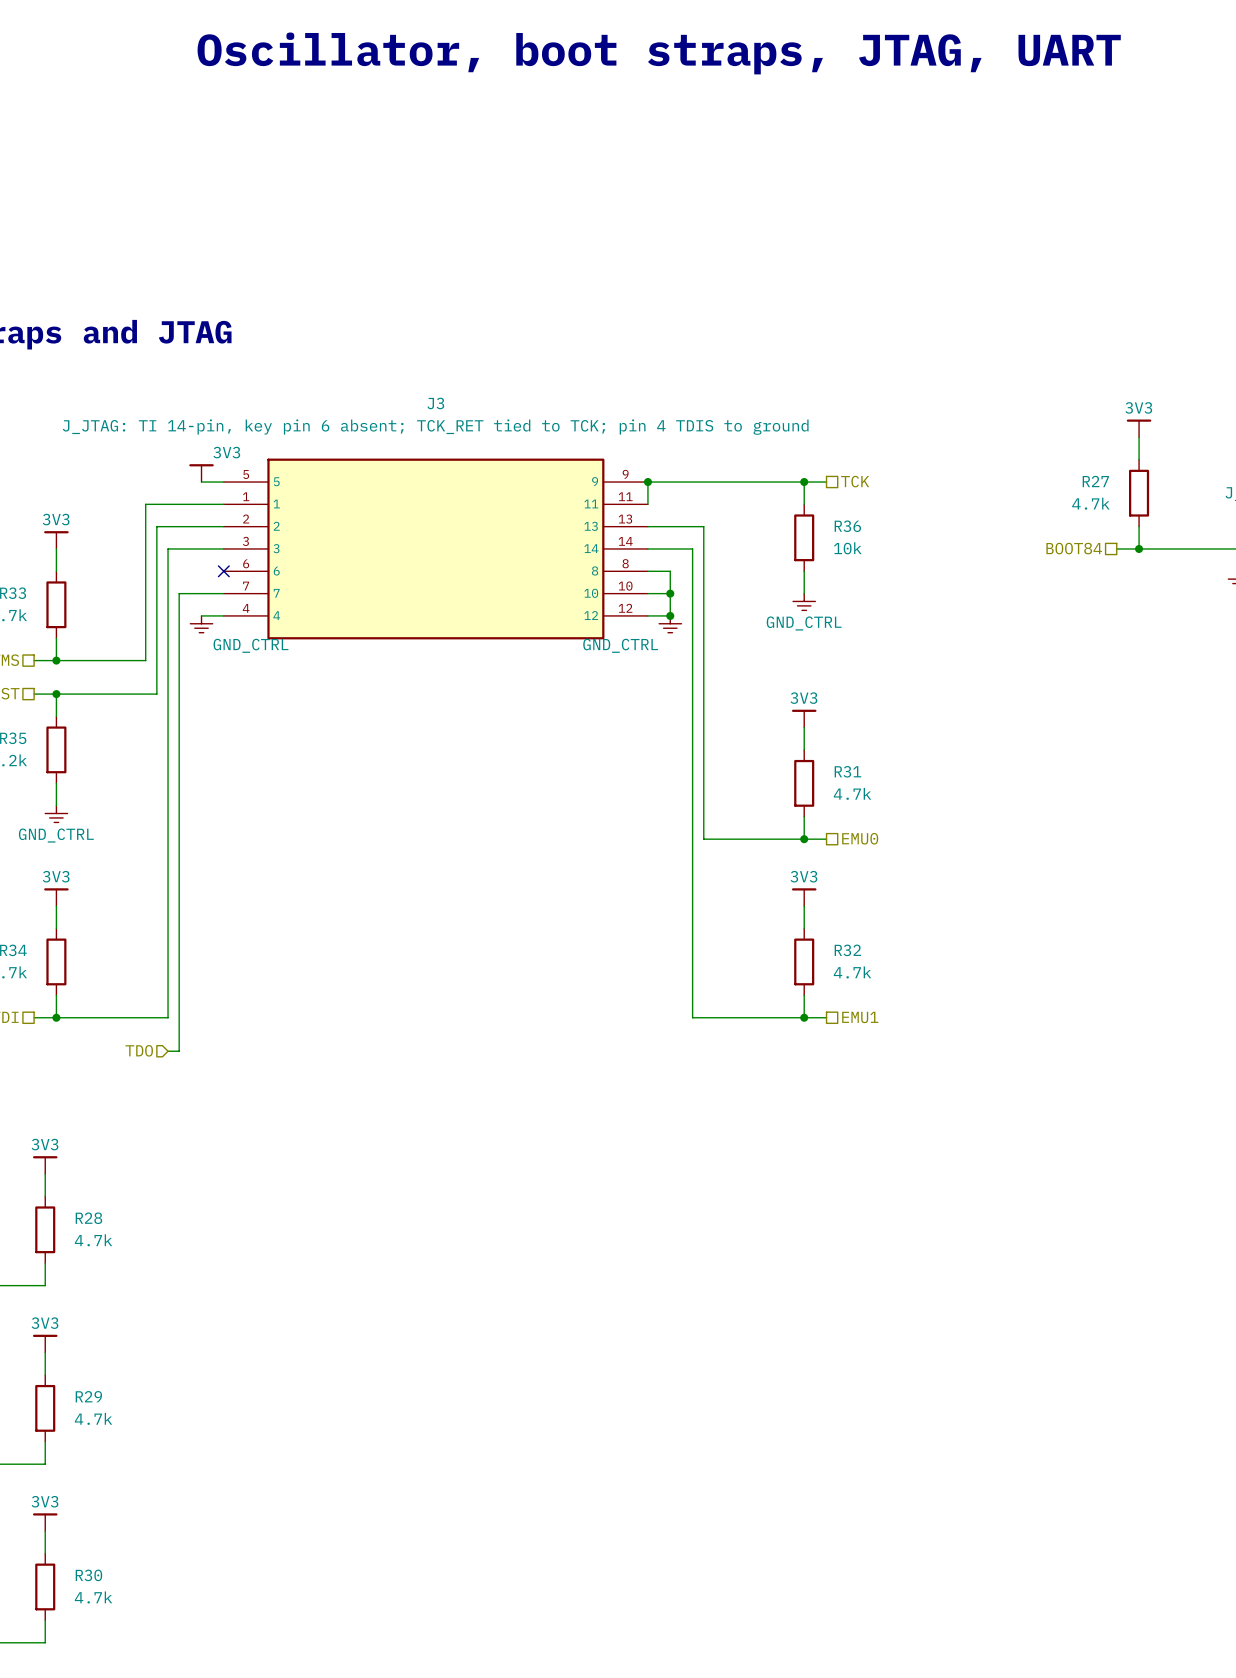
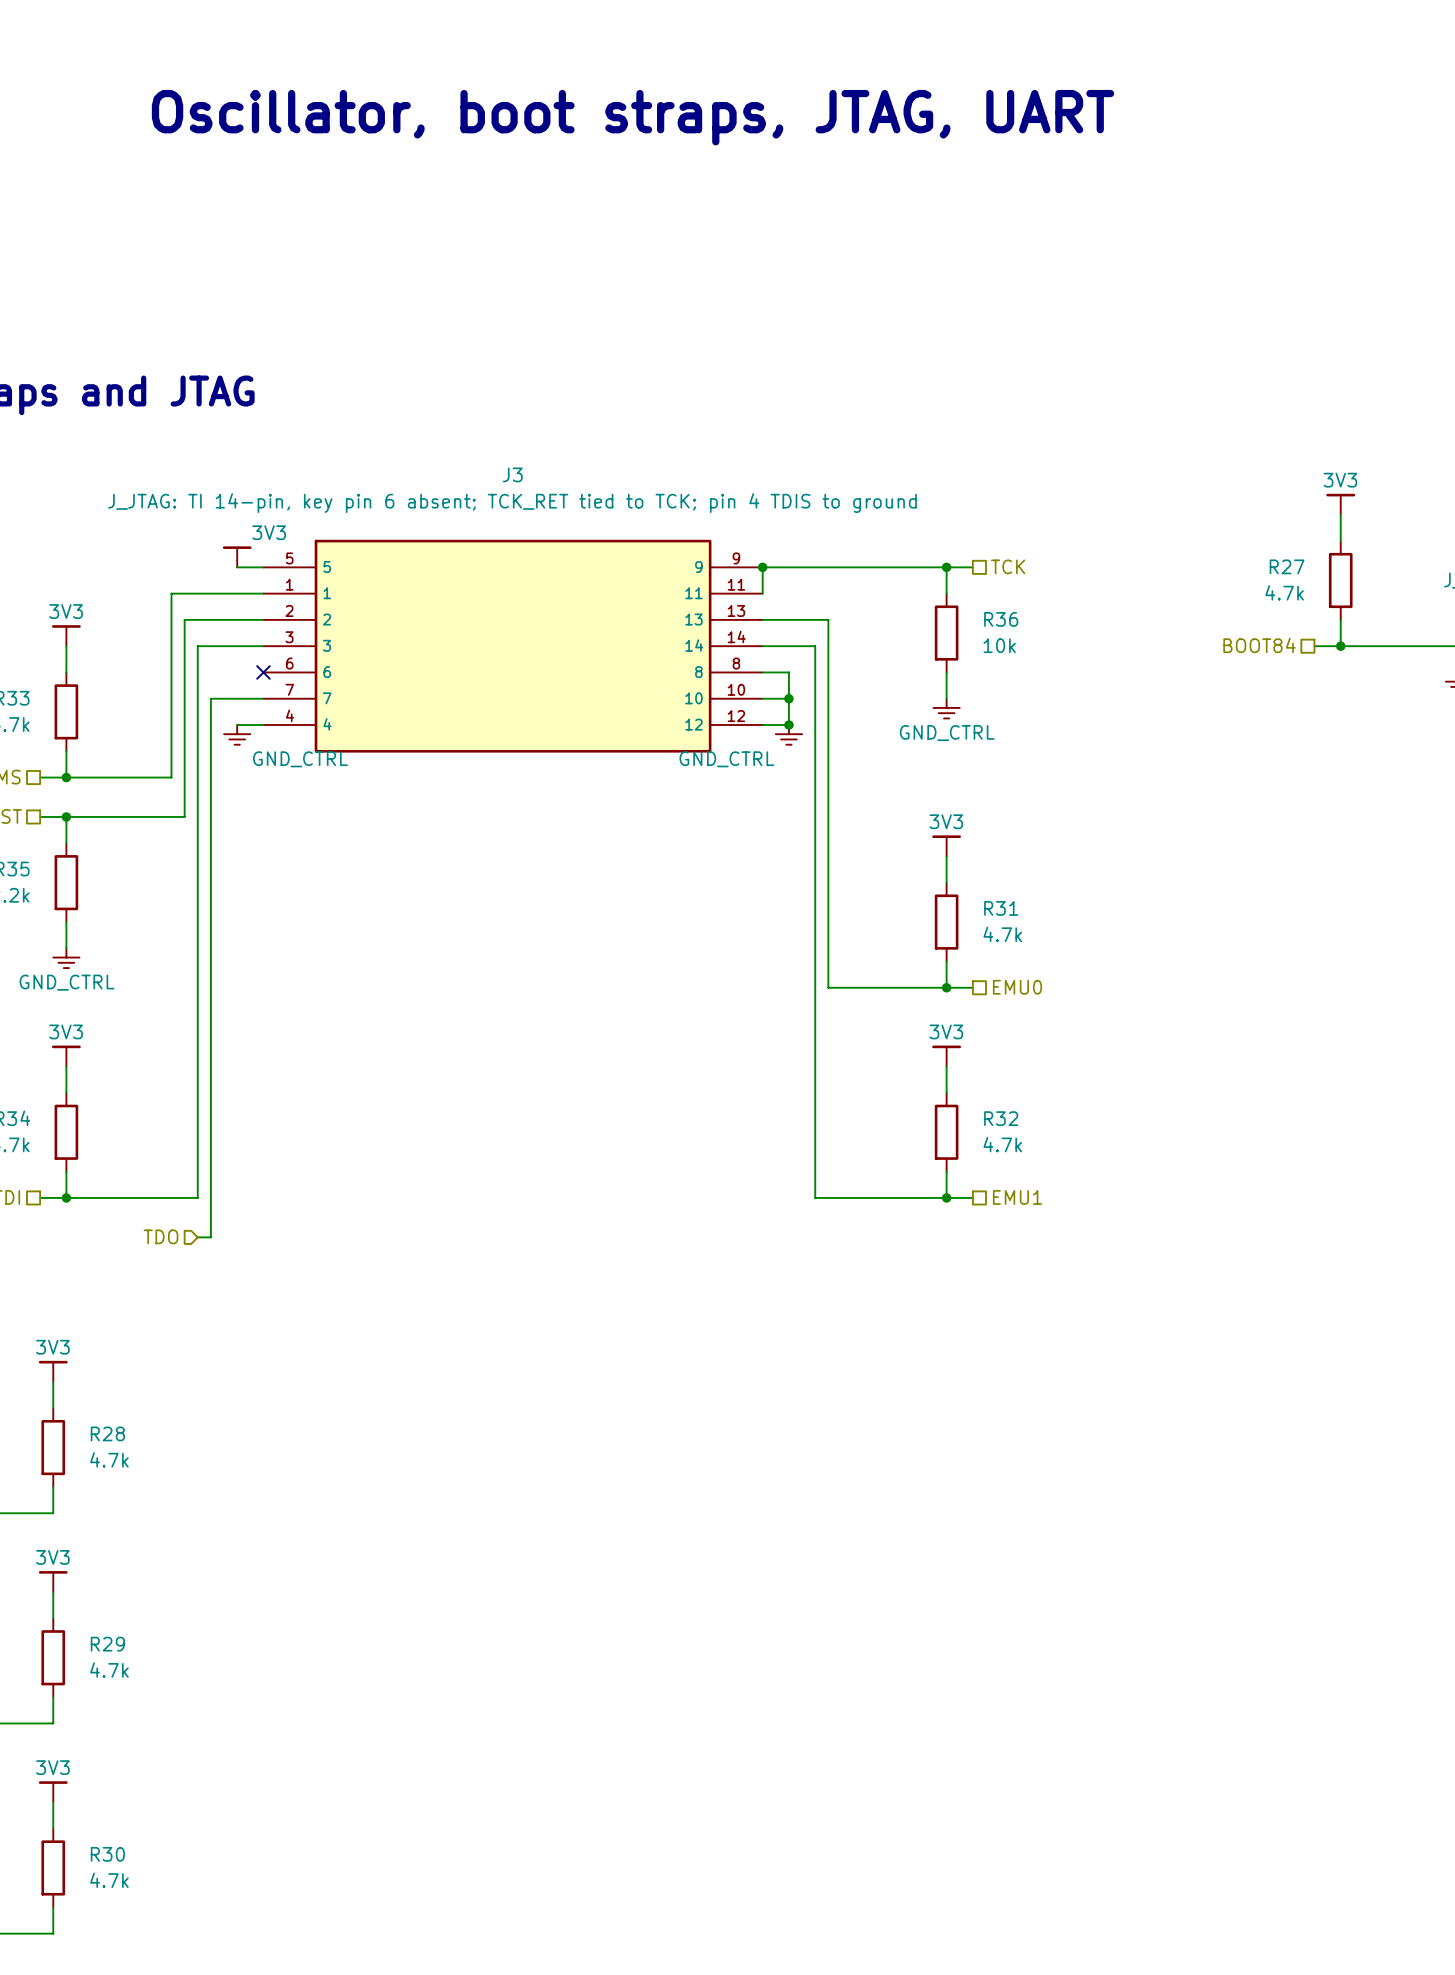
text position: Oscillator, boot straps, JTAG, UART (659, 53) -> Oscillator, boot straps, JTAG, UART (633, 117)

